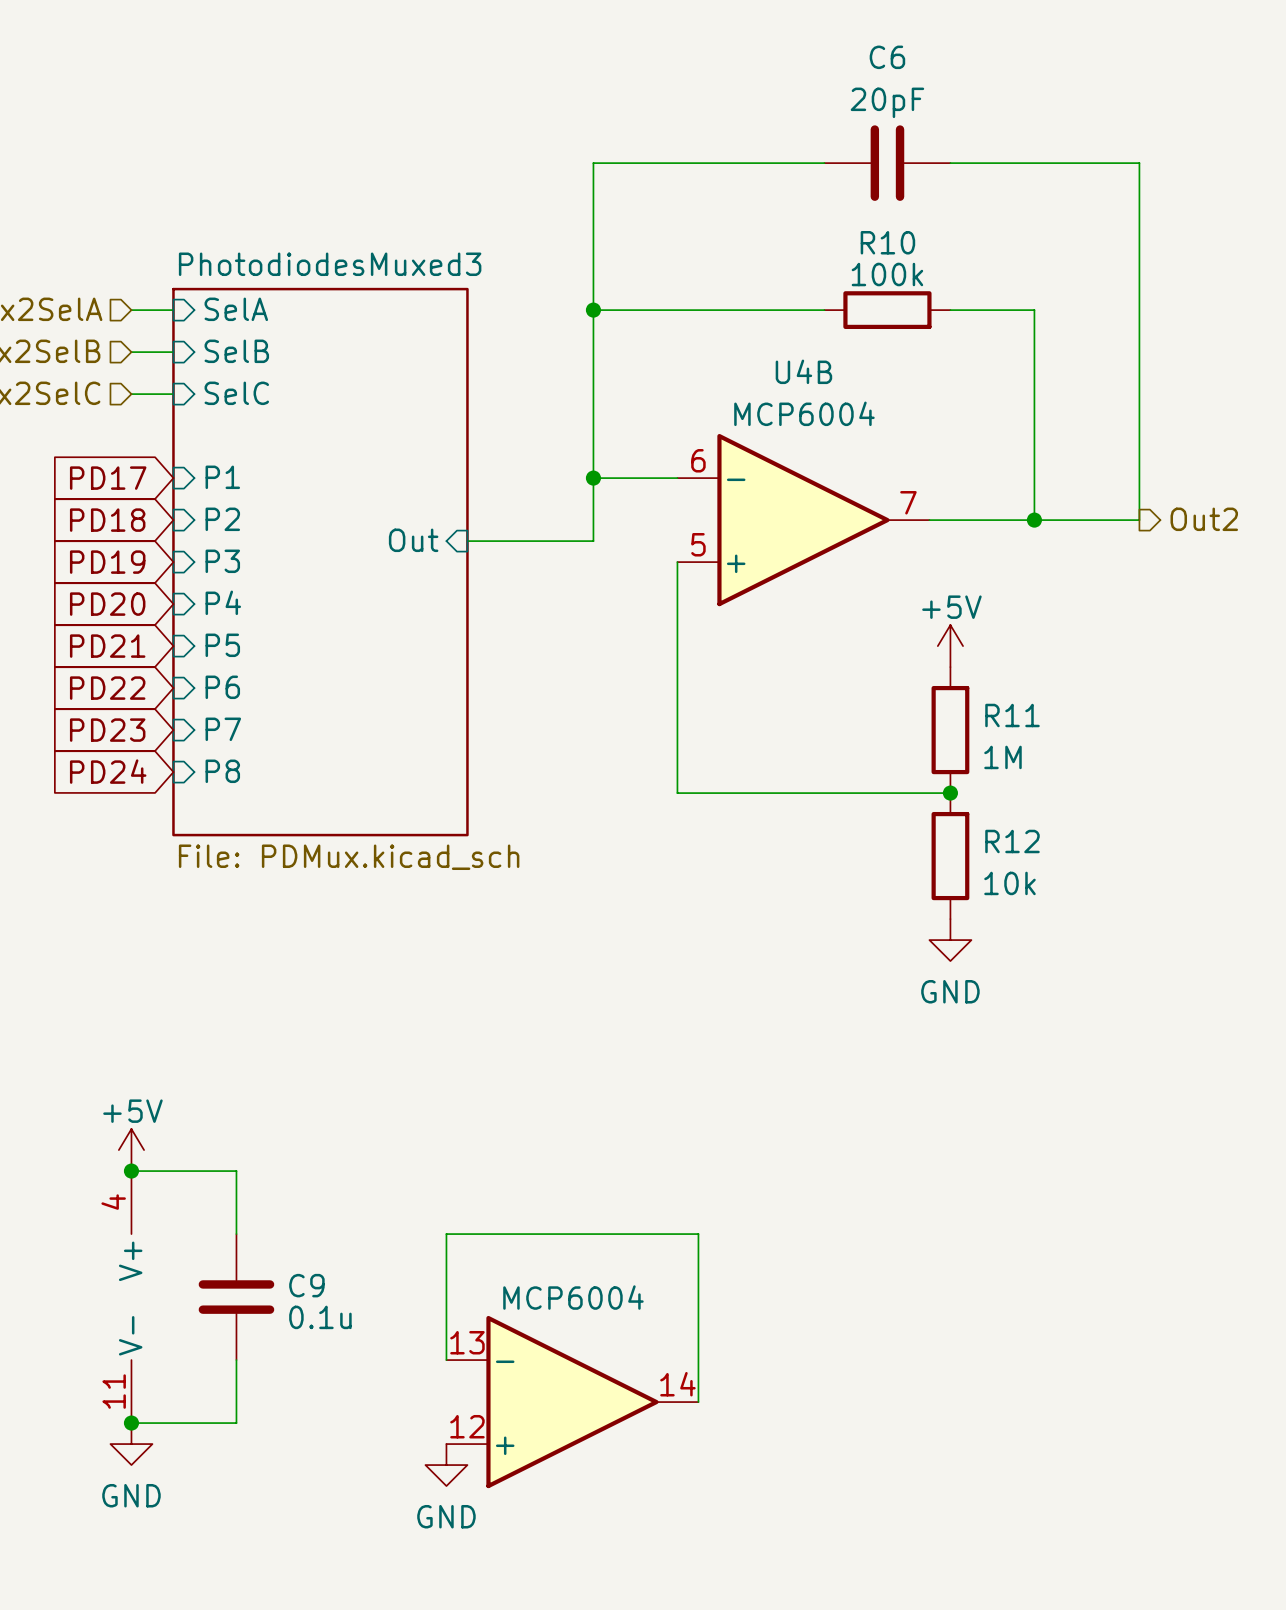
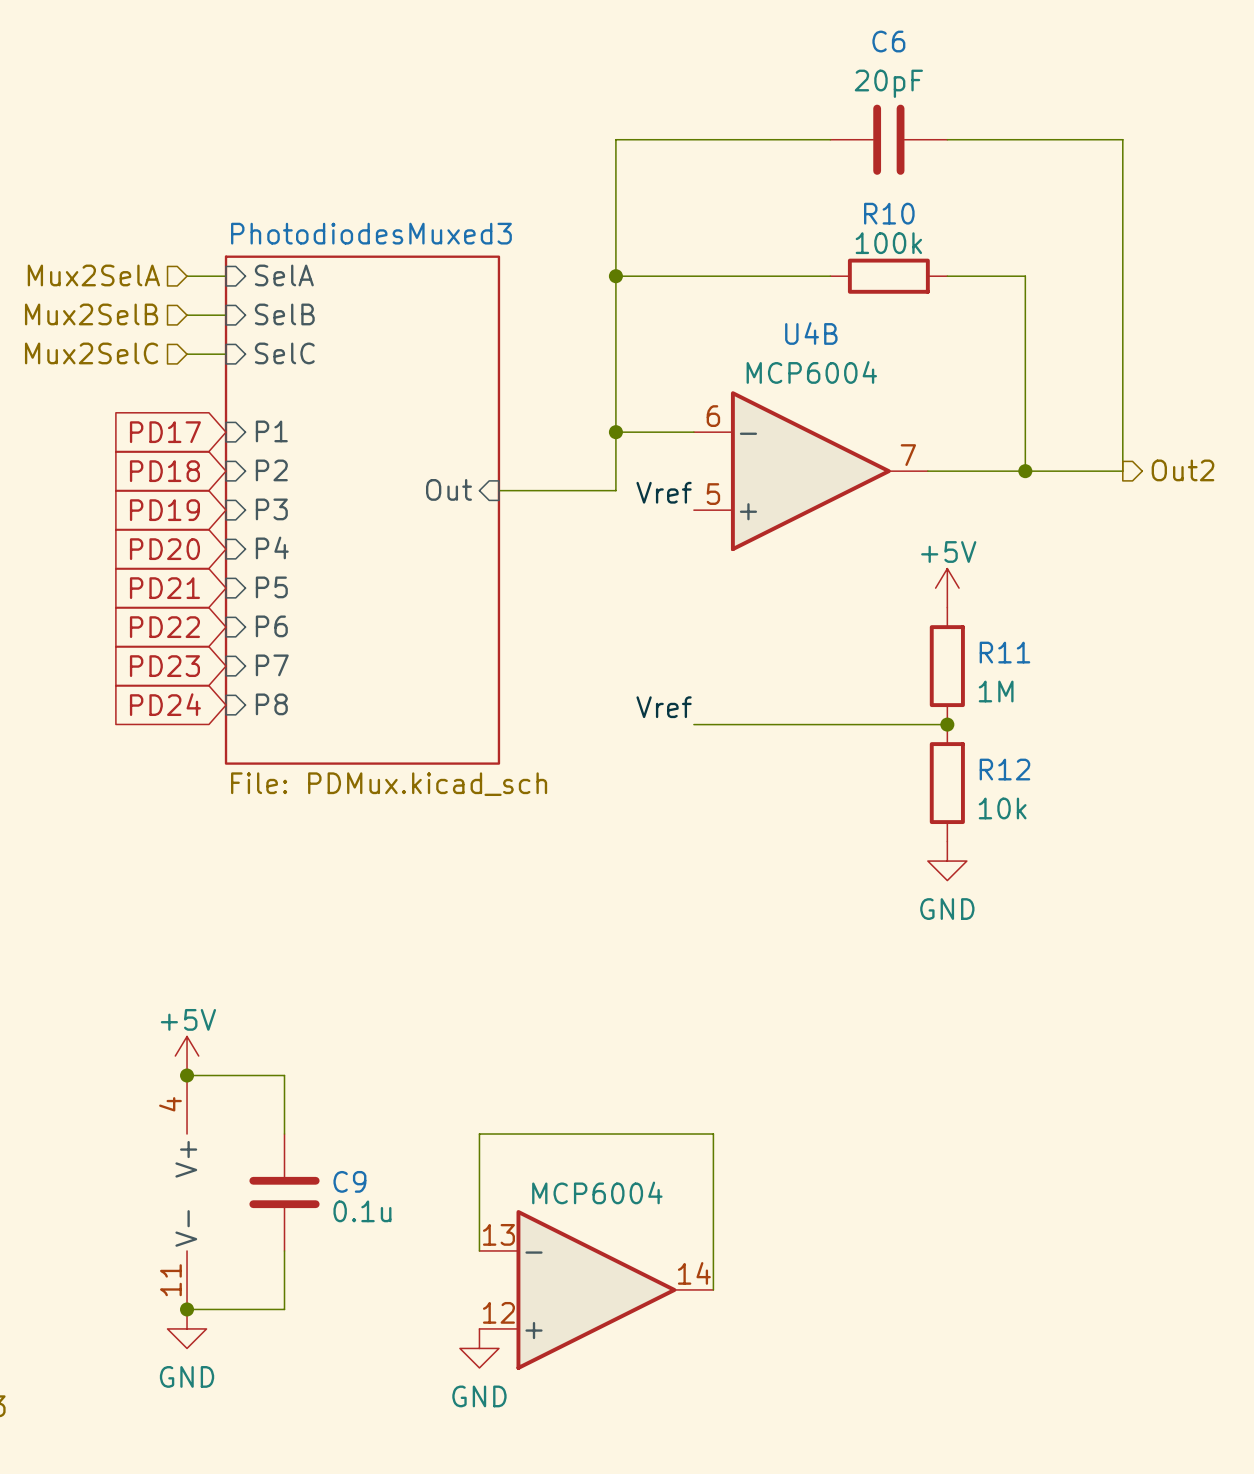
label: none -> Vref (664, 492)
wire: (677, 562) (677, 793) -> none
label: none -> Vref (664, 707)

